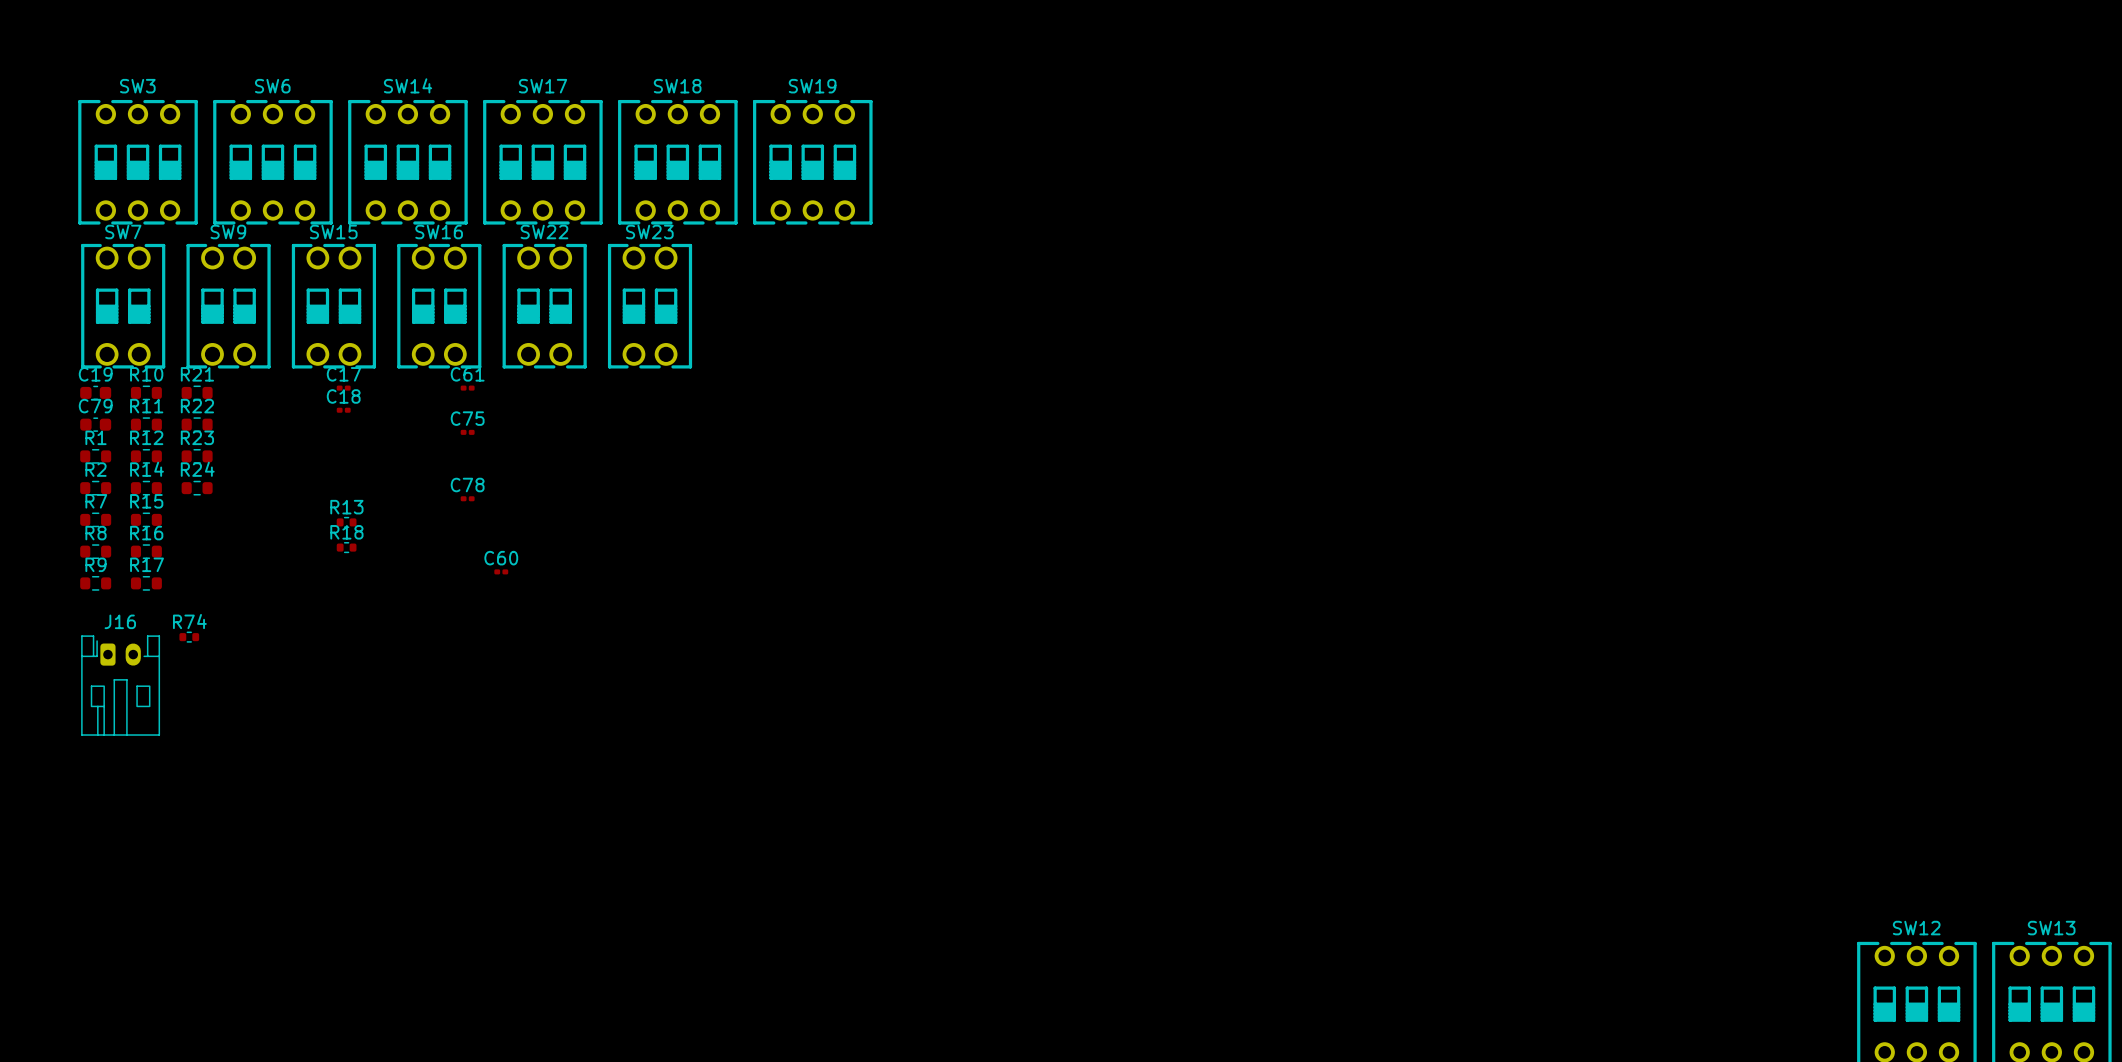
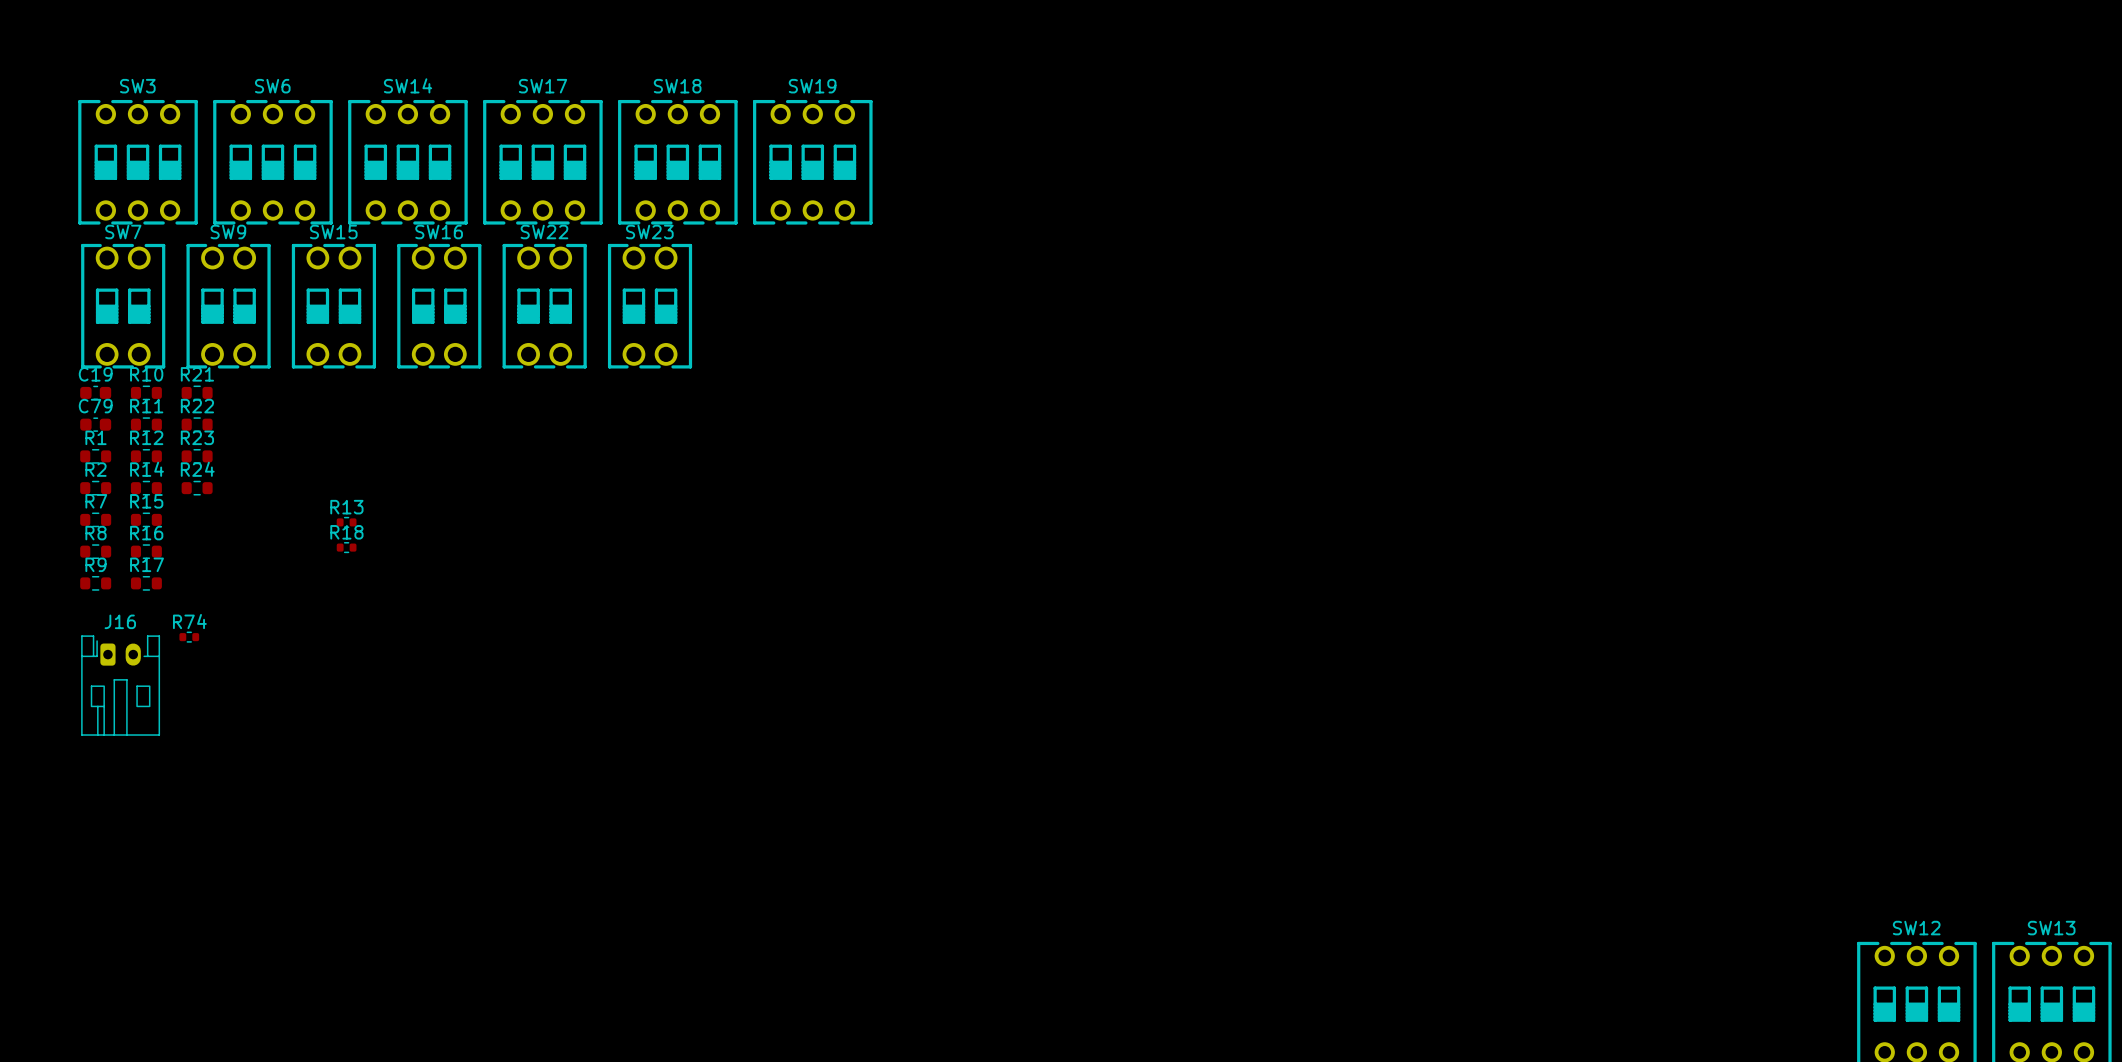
C17: (343, 388) -> none
C61: (467, 388) -> none
C18: (343, 410) -> none
C75: (467, 432) -> none
C78: (467, 498) -> none
C60: (501, 571) -> none

